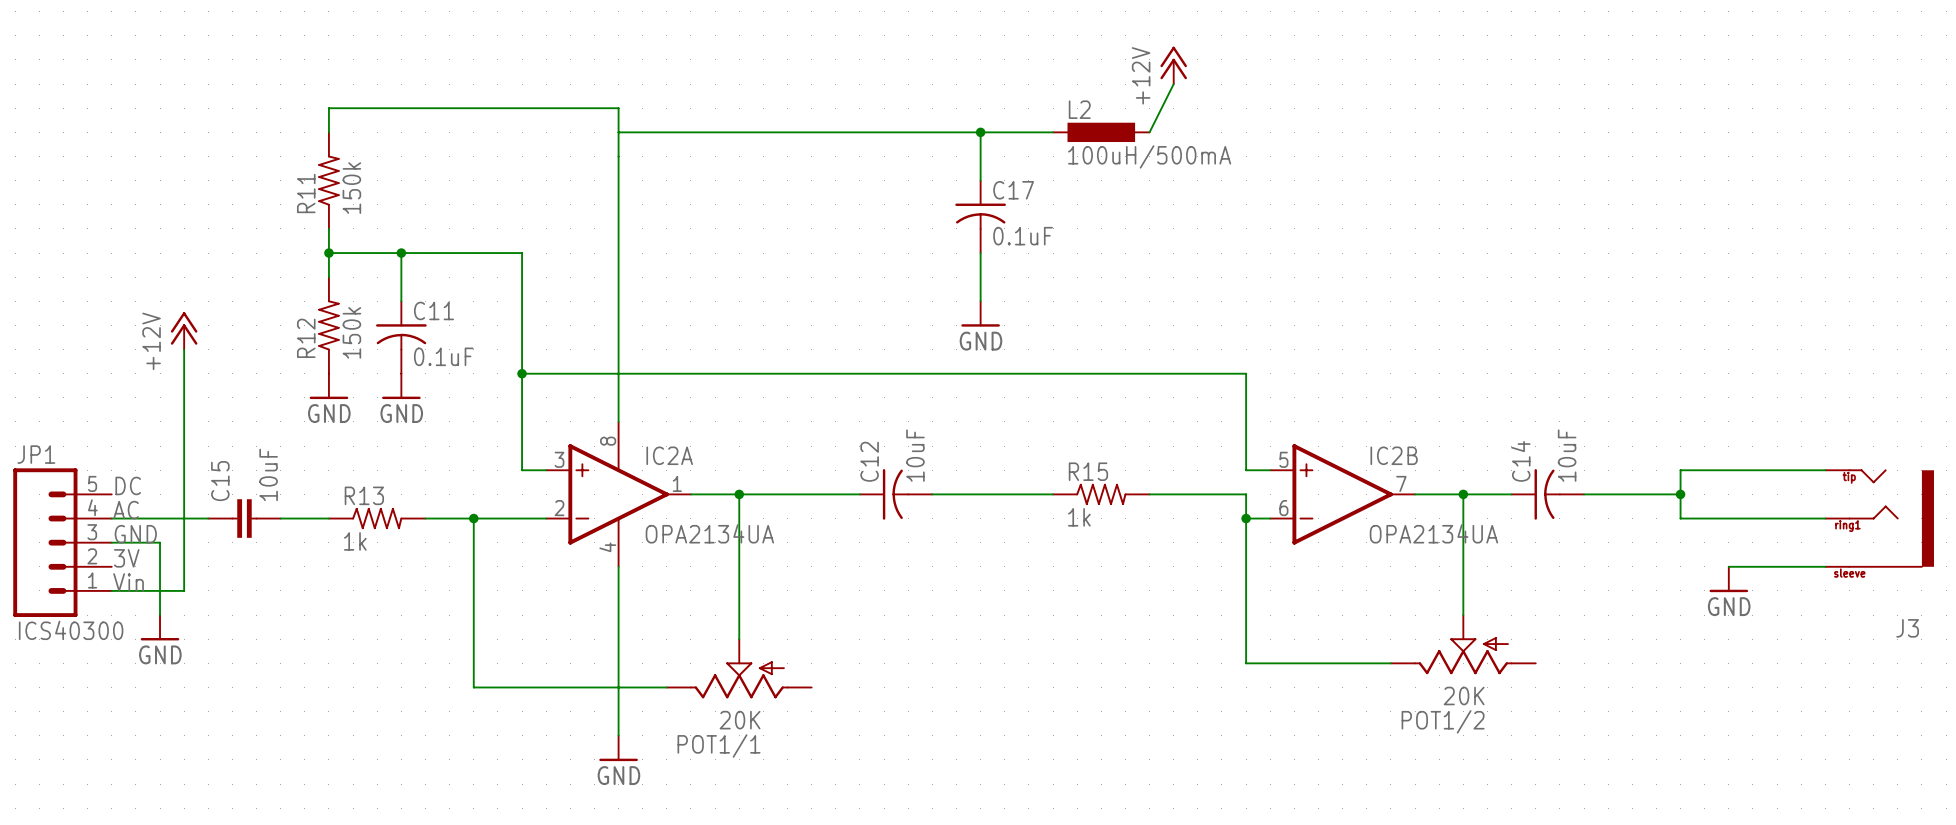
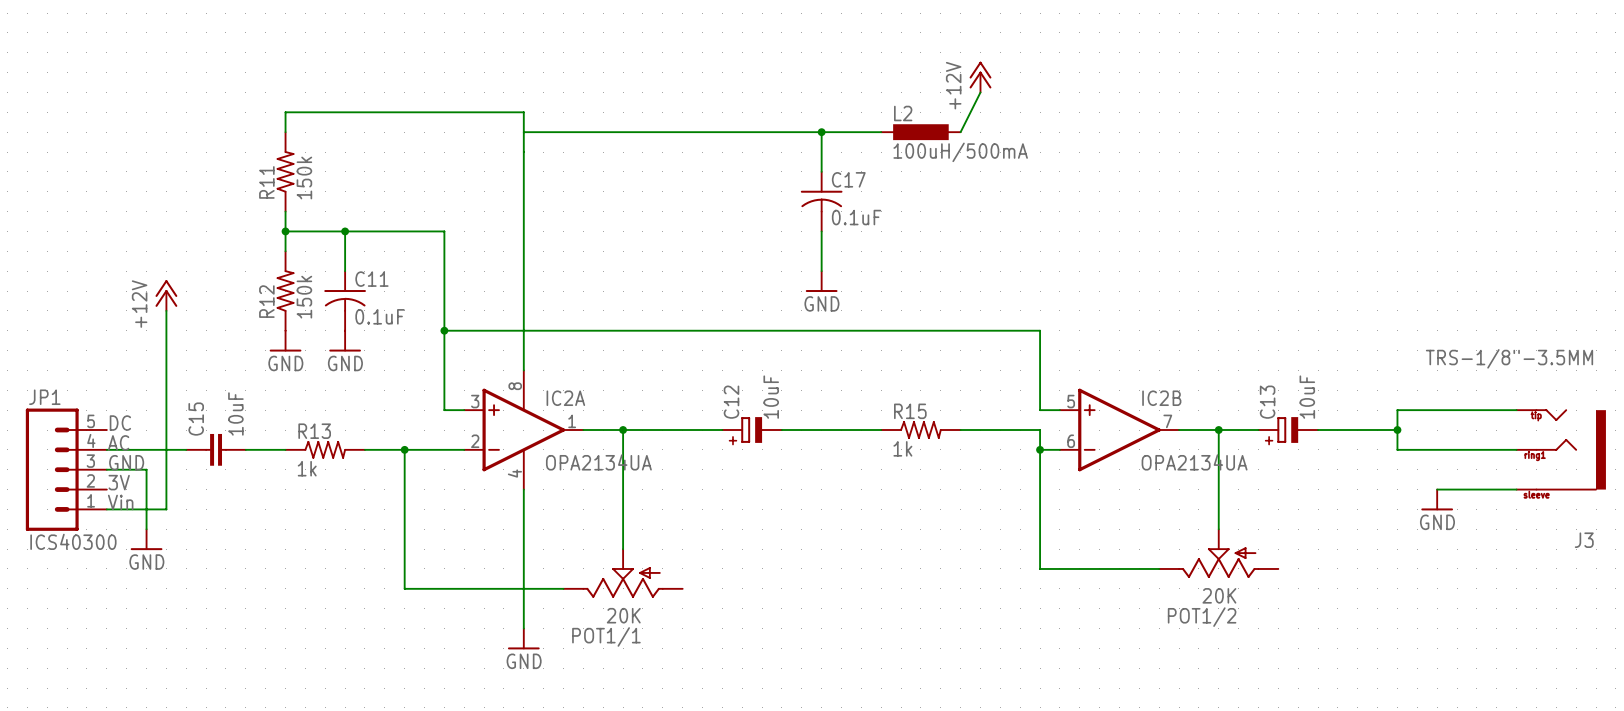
J3 value: none -> TRS-1/8"-3.5MM (1509, 358)
C12 symbol: [859, 469, 933, 520] -> [722, 417, 782, 443]
C14: 10uF (1547, 494) -> none
C13: none -> 10uF (1288, 430)

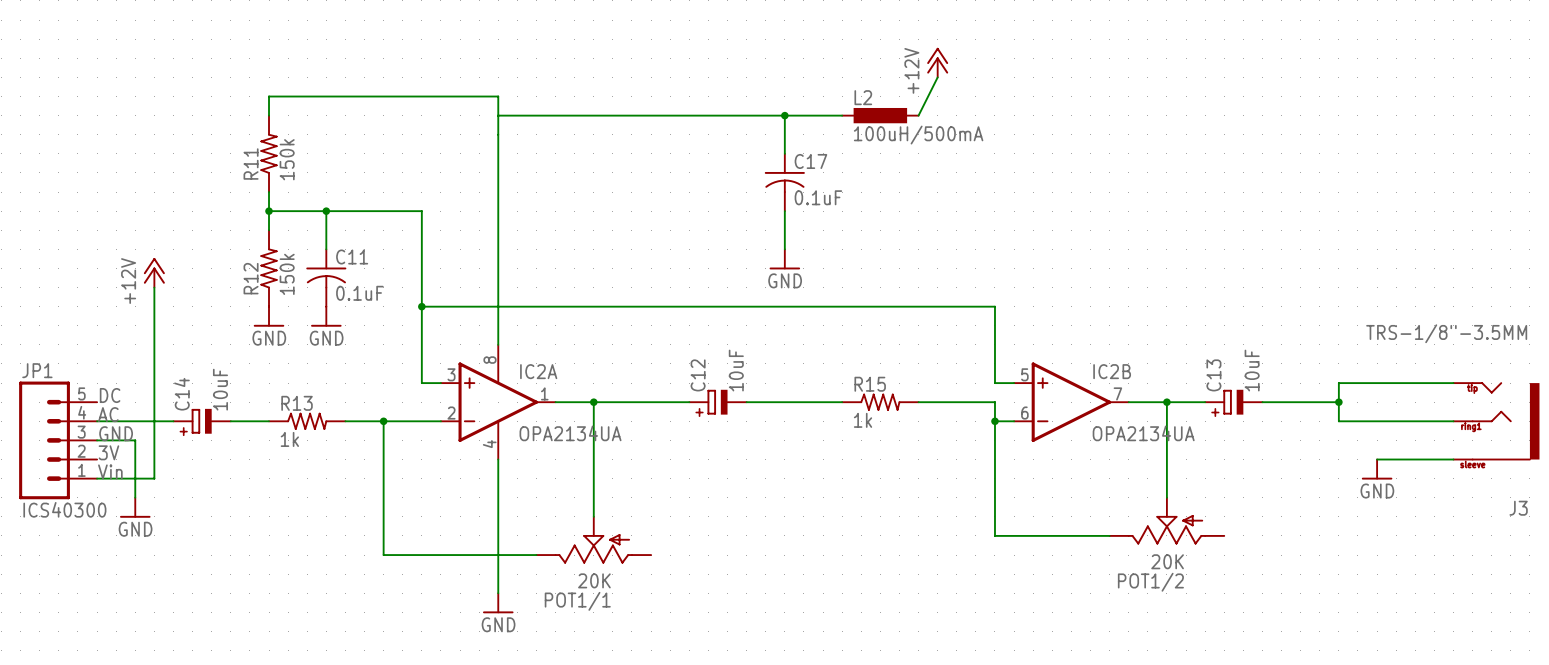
C15: 10uF (216, 449) -> none
C14: none -> 10uF (202, 421)

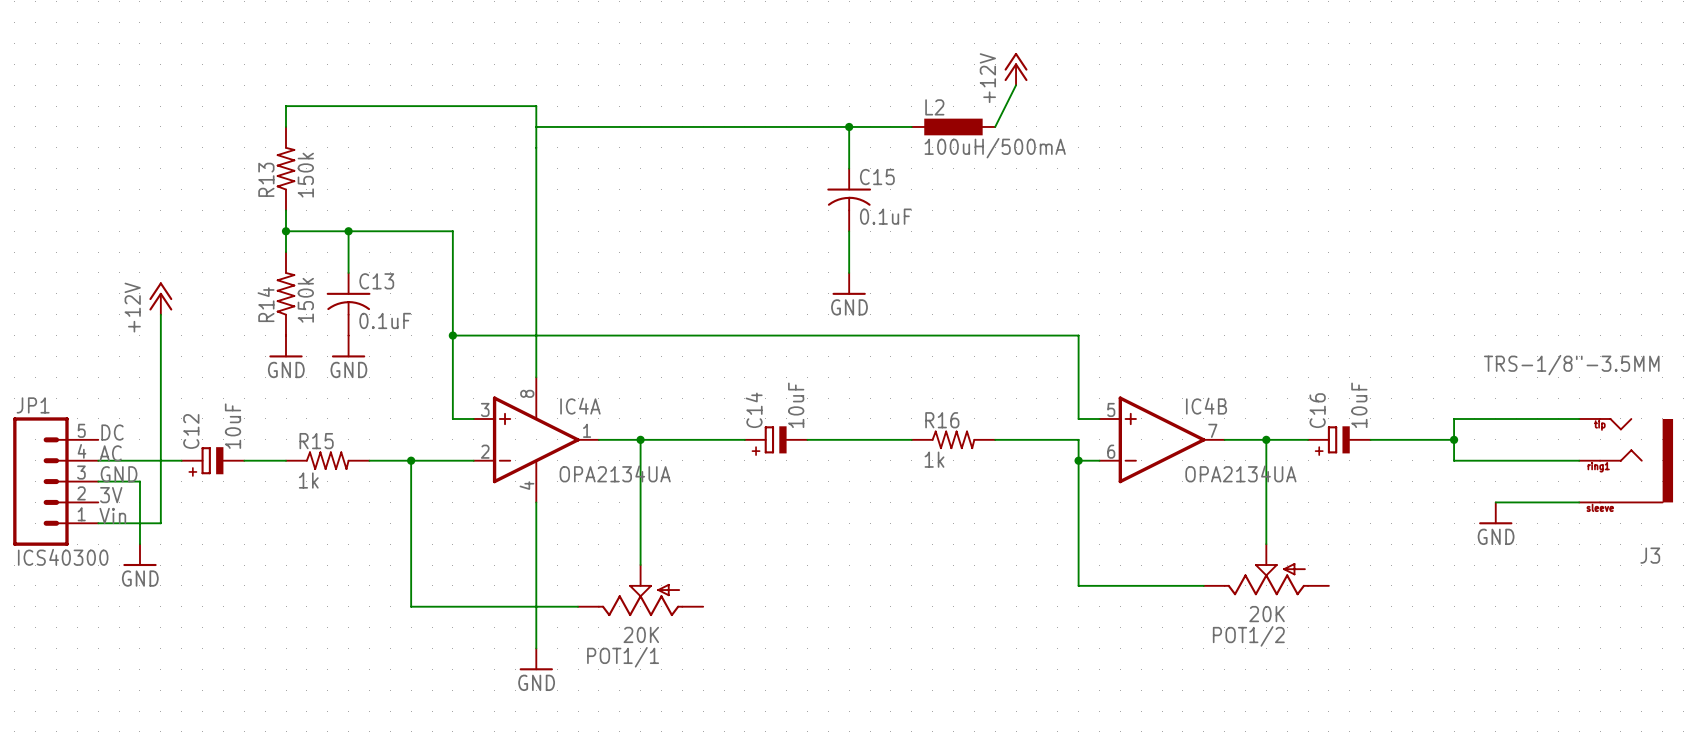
C17 name: C17 (810, 161) -> C15 (877, 177)
R11 name: R11 (251, 164) -> R13 (266, 179)
C11 name: C11 (352, 257) -> C13 (376, 281)
R12 name: R12 (251, 278) -> R14 (266, 304)
IC2A name: IC2A (538, 371) -> IC4A (580, 406)
IC2B name: IC2B (1112, 371) -> IC4B (1206, 406)
C12 name: C12 (698, 375) -> C14 (754, 410)
C13 name: C13 (1213, 375) -> C16 (1317, 410)
R15 name: R15 (870, 384) -> R16 (942, 420)
C14 name: C14 (181, 394) -> C12 (191, 431)
R13 name: R13 (297, 403) -> R15 (316, 441)

